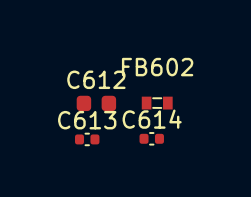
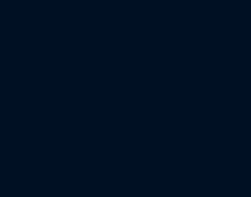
C612: (96, 103) -> none
FB602: (157, 103) -> none
C614: (151, 138) -> none
C613: (87, 139) -> none

